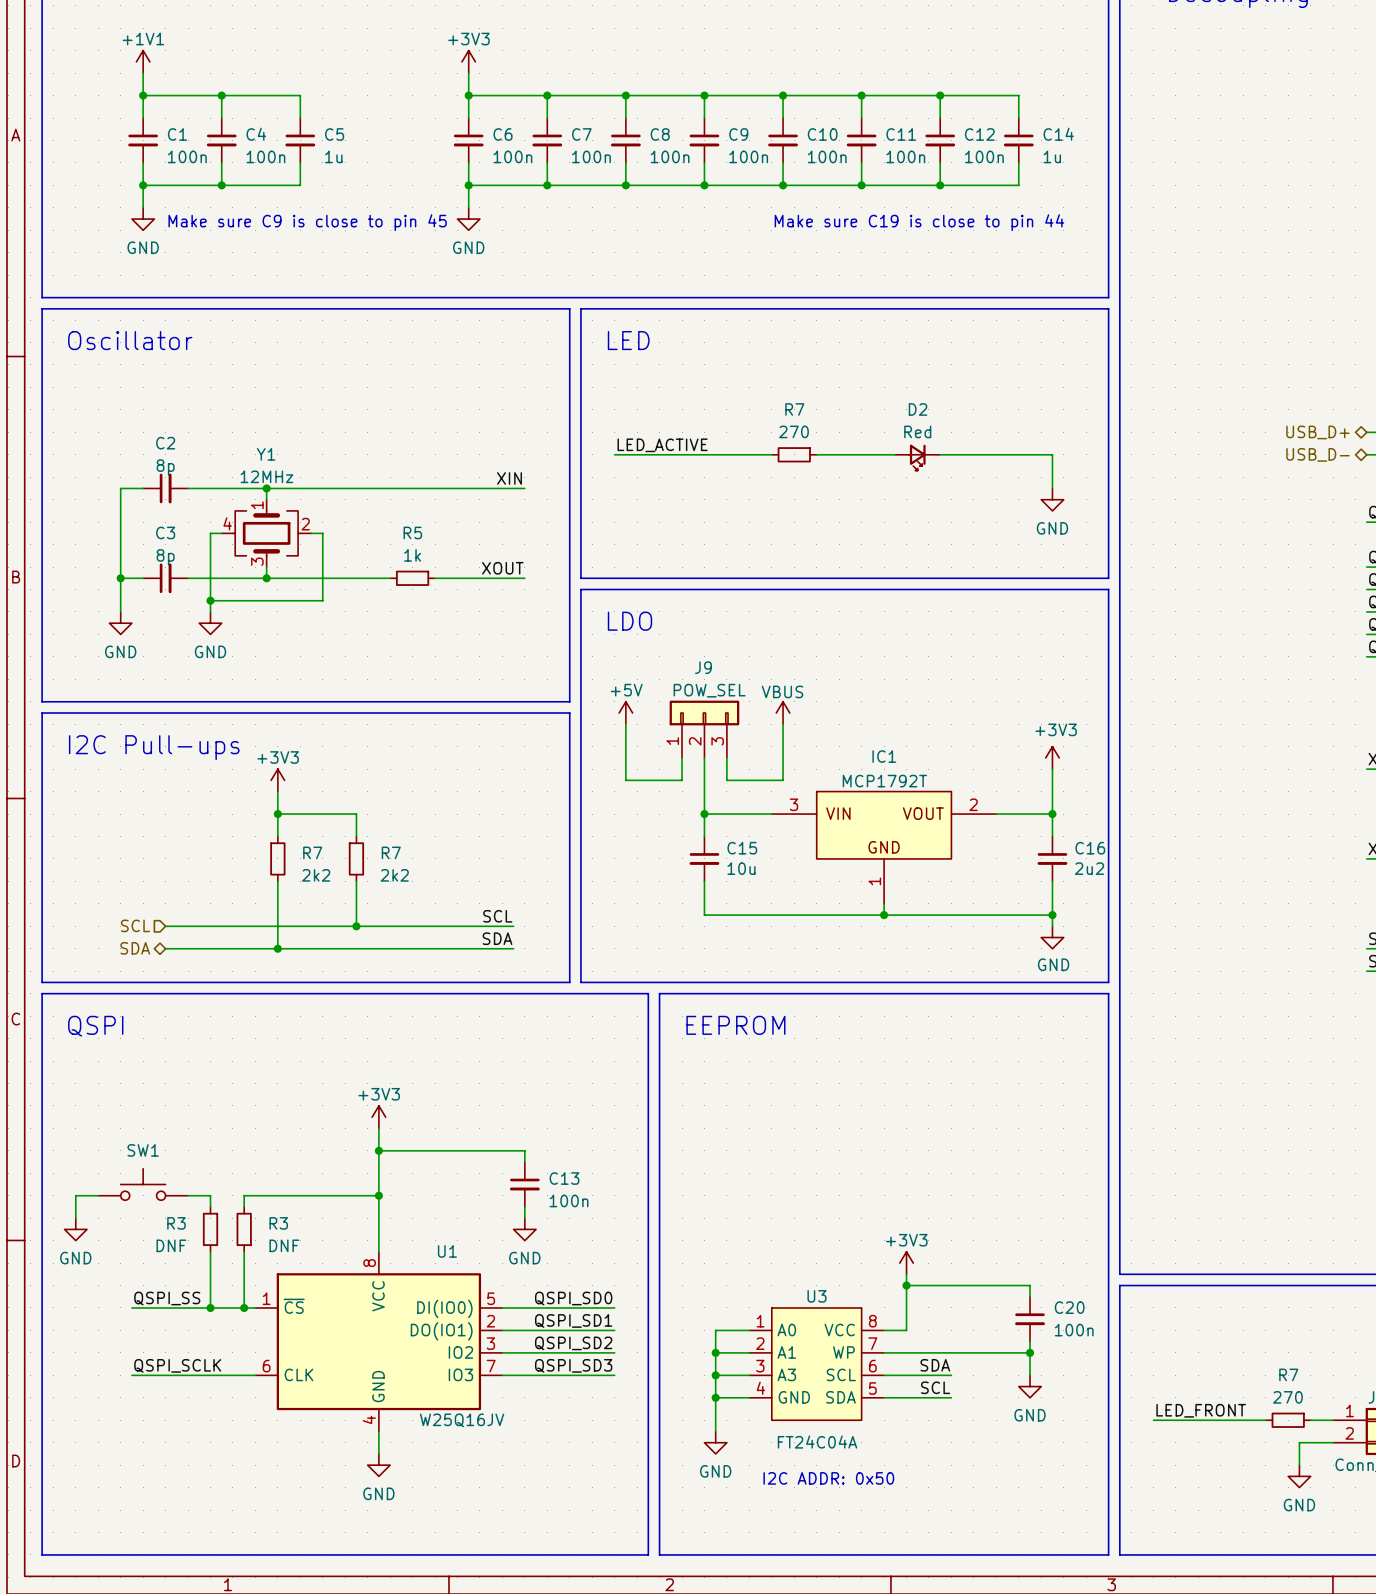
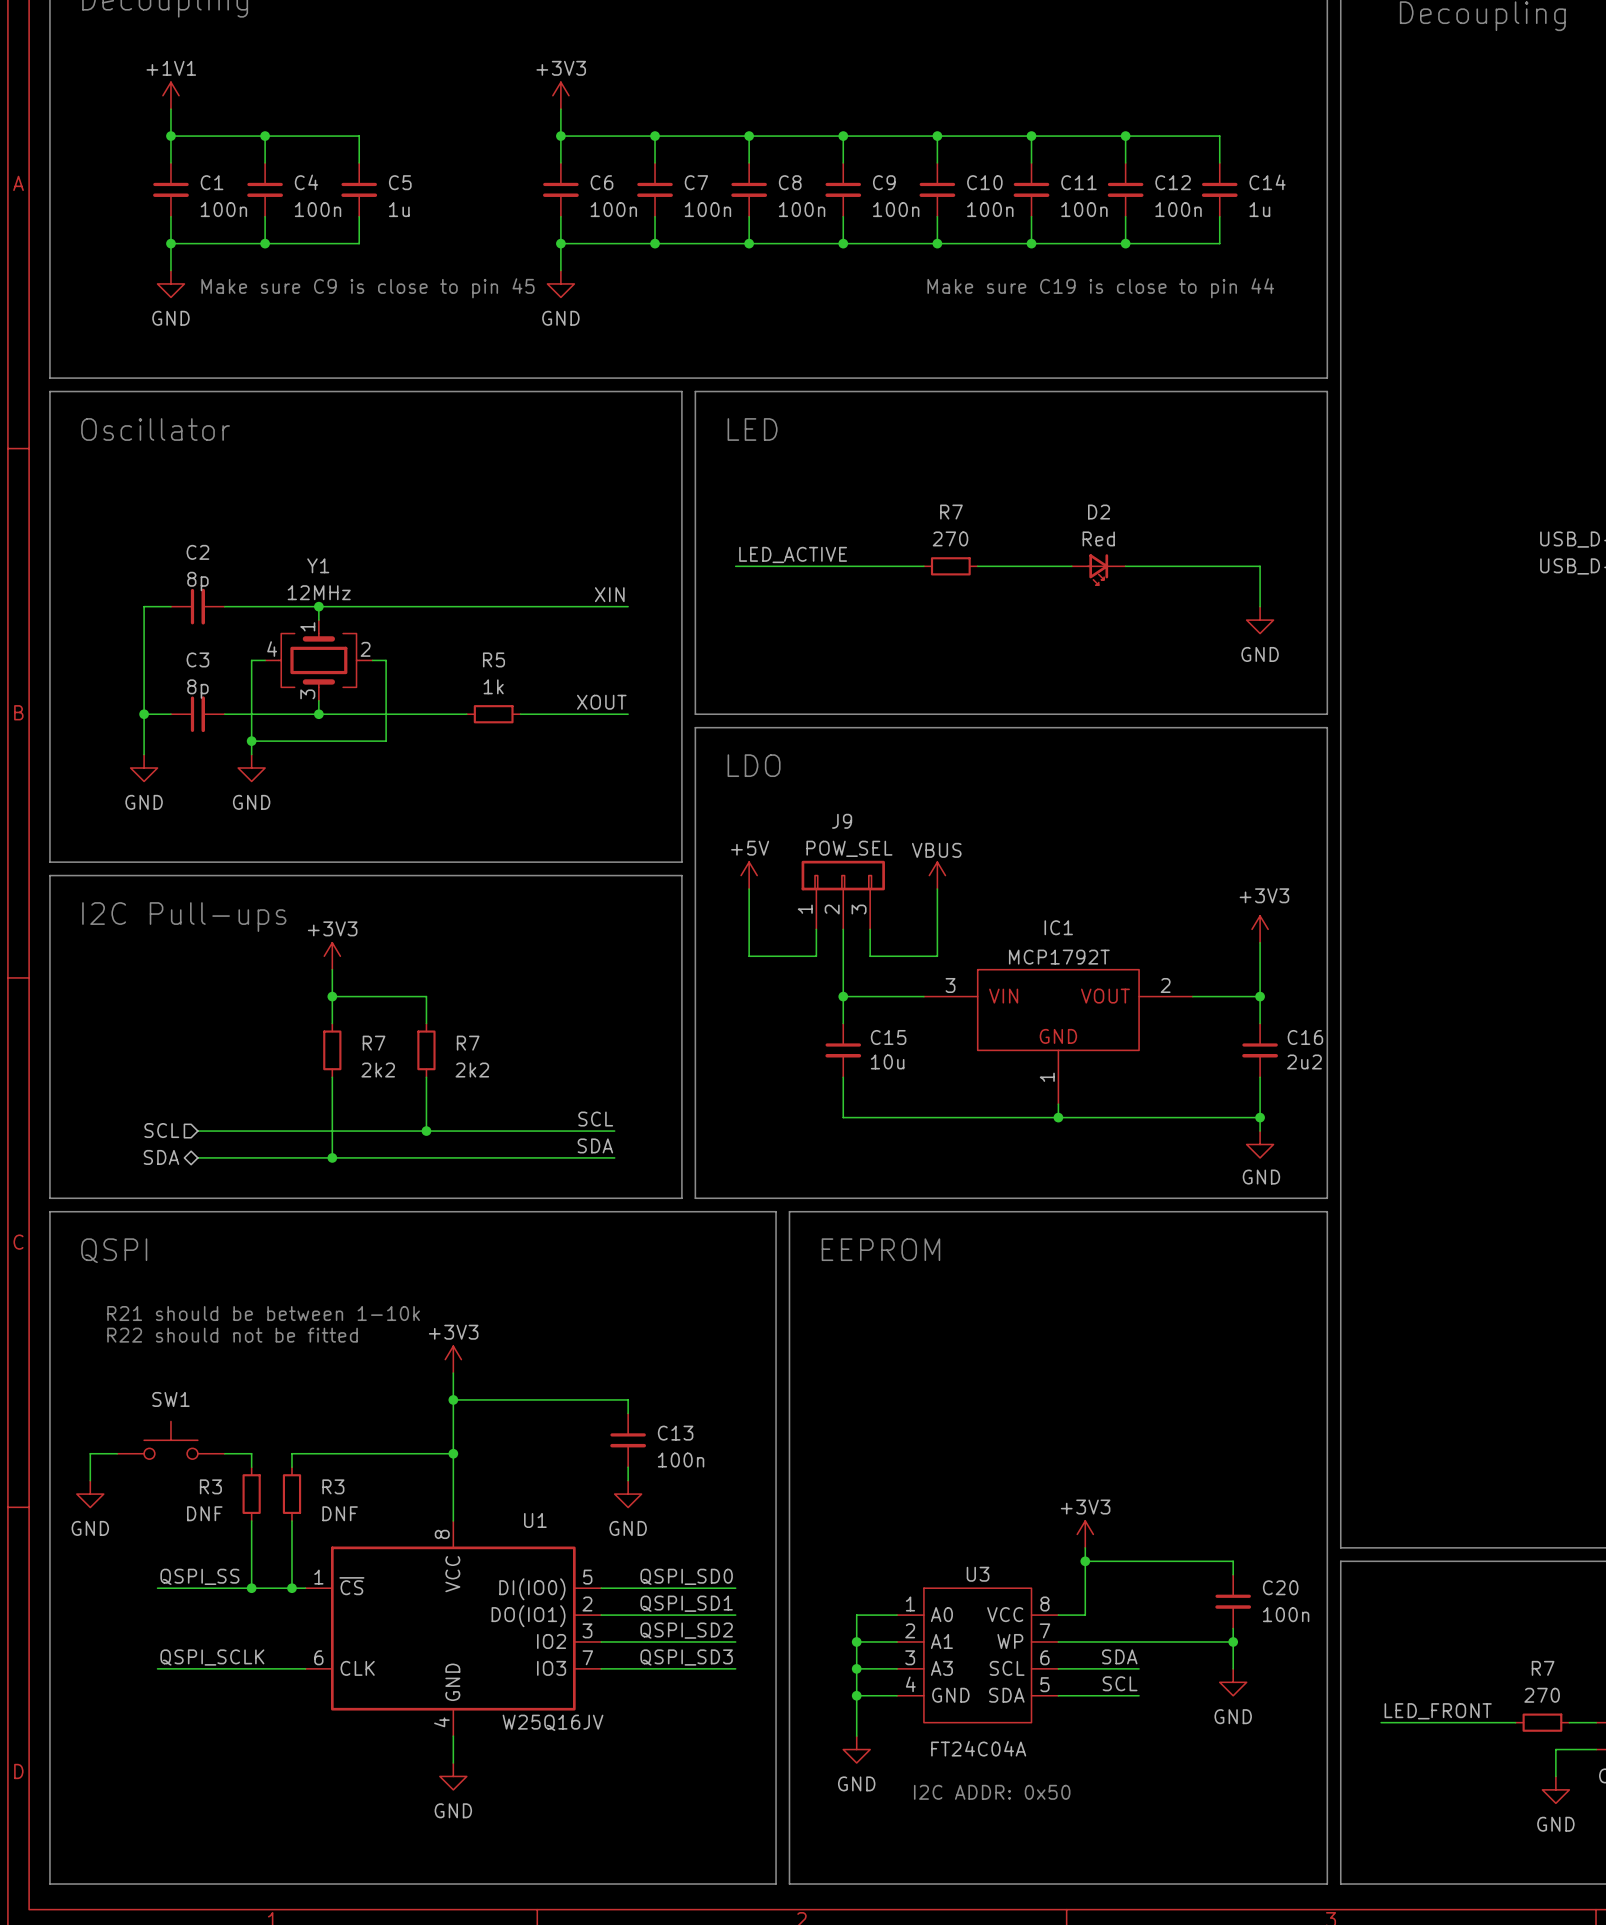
text: none -> R21 should be between 1-10k (263, 1313)
text: none -> R22 should not be fitted (232, 1335)

